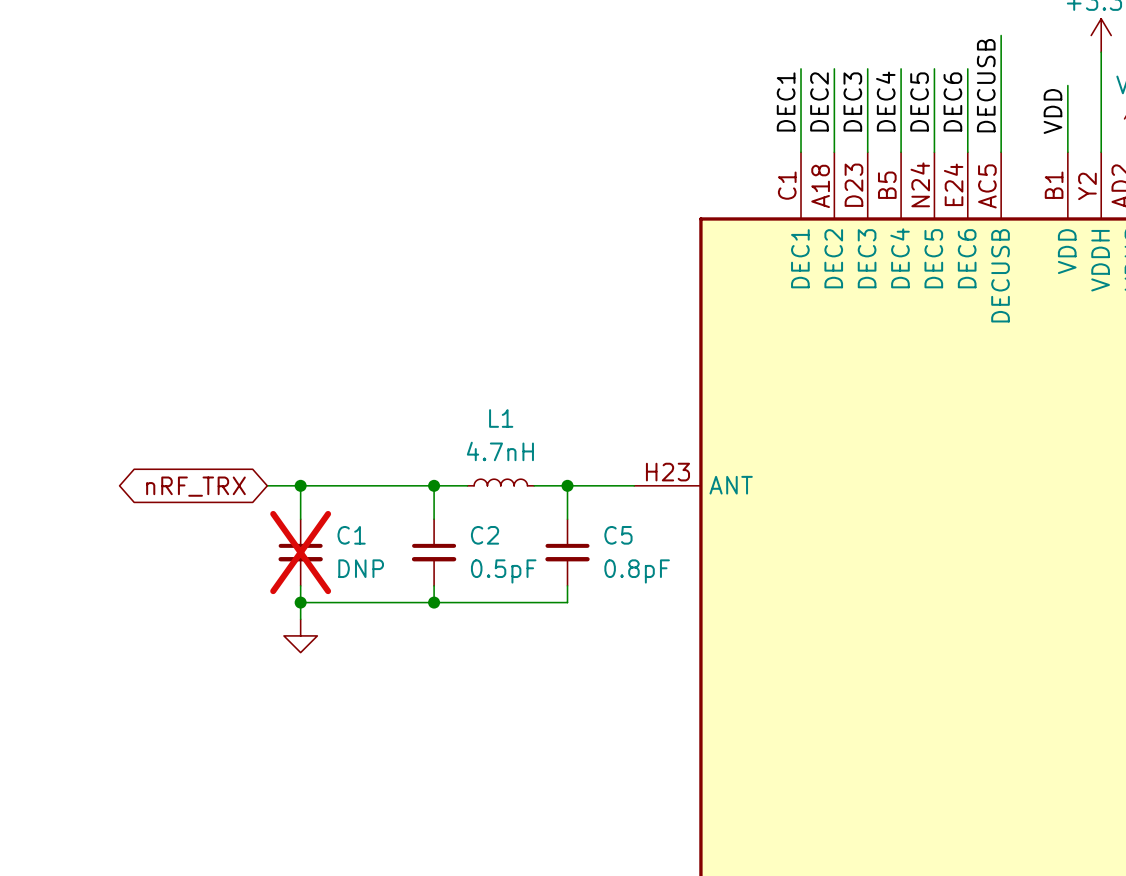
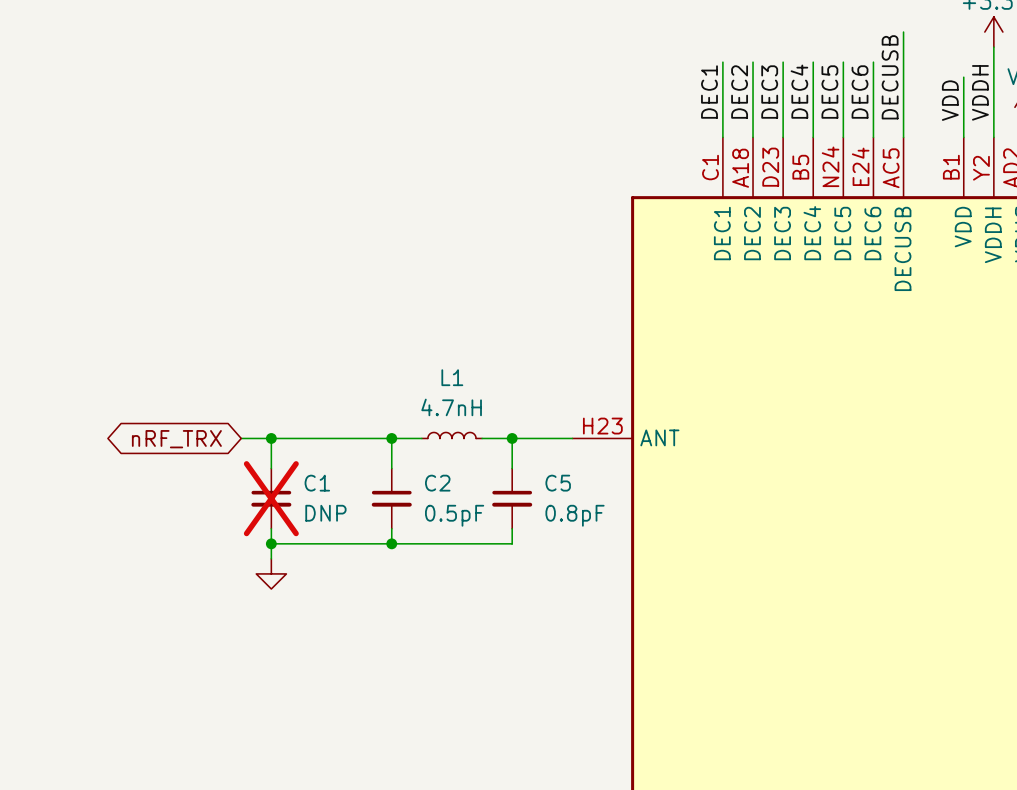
label: none -> VDDH (980, 92)

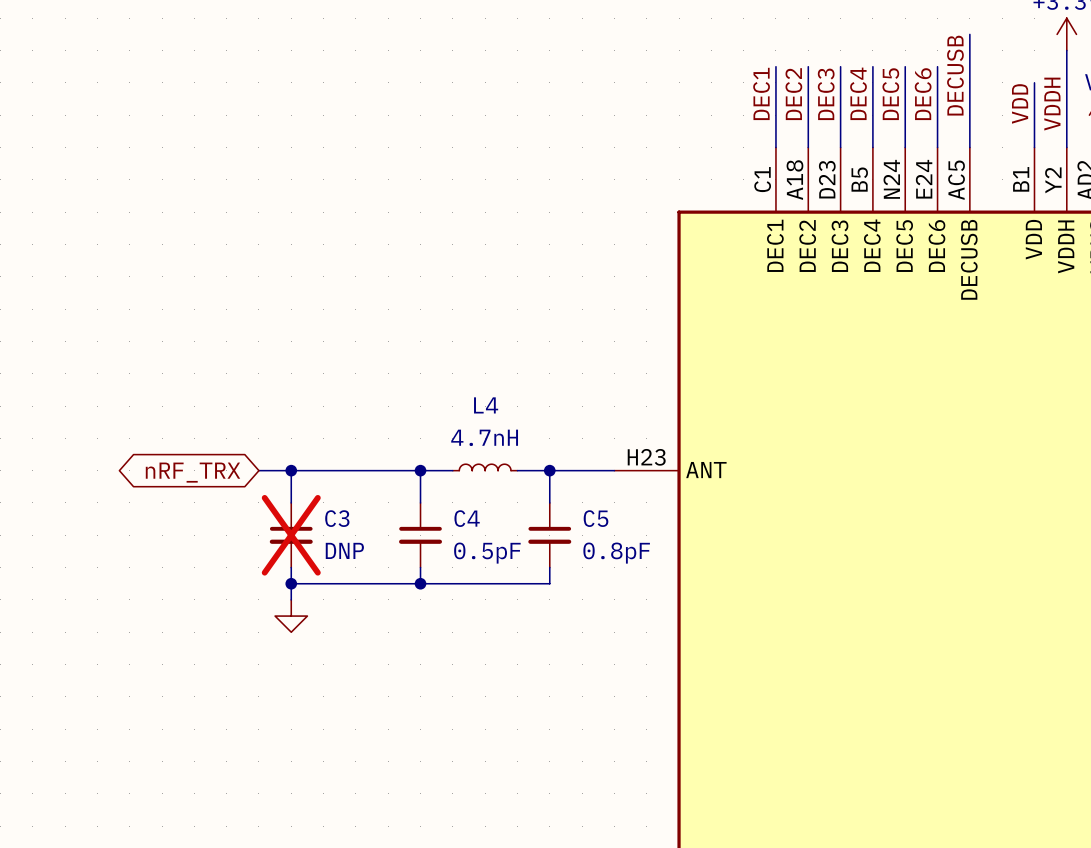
L1 name: L1 (452, 377) -> L4 (486, 405)
C1 name: C1 (317, 483) -> C3 (337, 518)
C2 name: C2 (437, 483) -> C4 (467, 518)

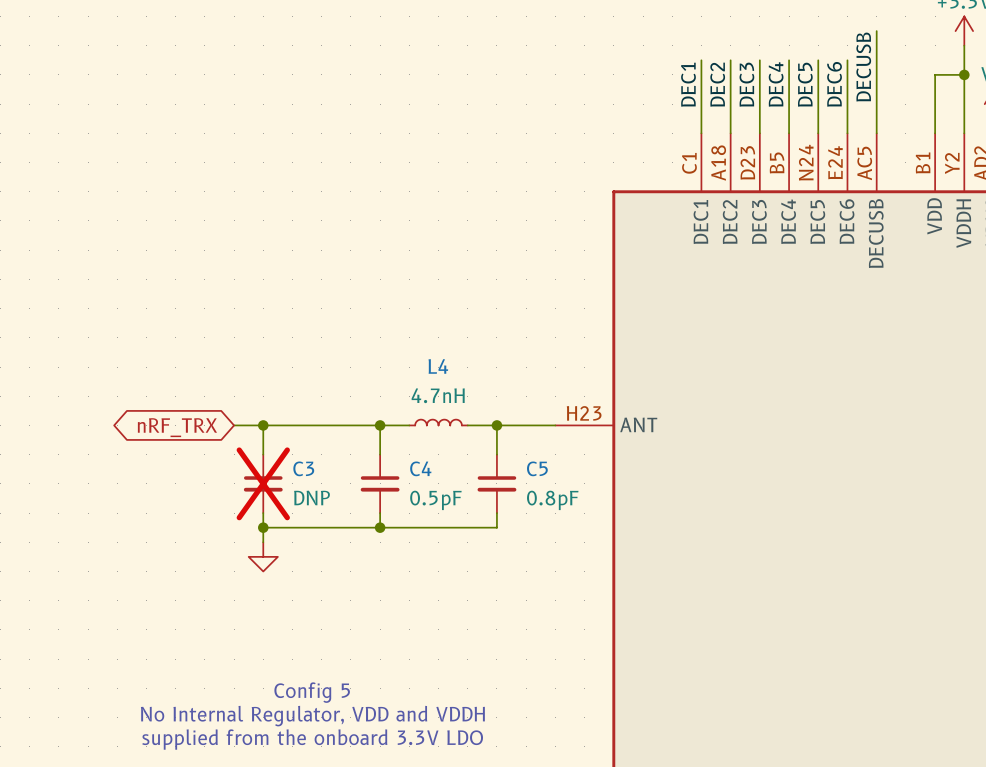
wire: none -> (935, 74) (964, 74)
junction: none -> (964, 74)
label: VDD (1020, 103) -> none
label: VDDH (1052, 104) -> none
text: none -> Config 5 (312, 692)
text: none -> No Internal Regulator, VDD and VDDH (312, 716)
text: none -> supplied from the onboard 3.3V LDO (312, 739)

